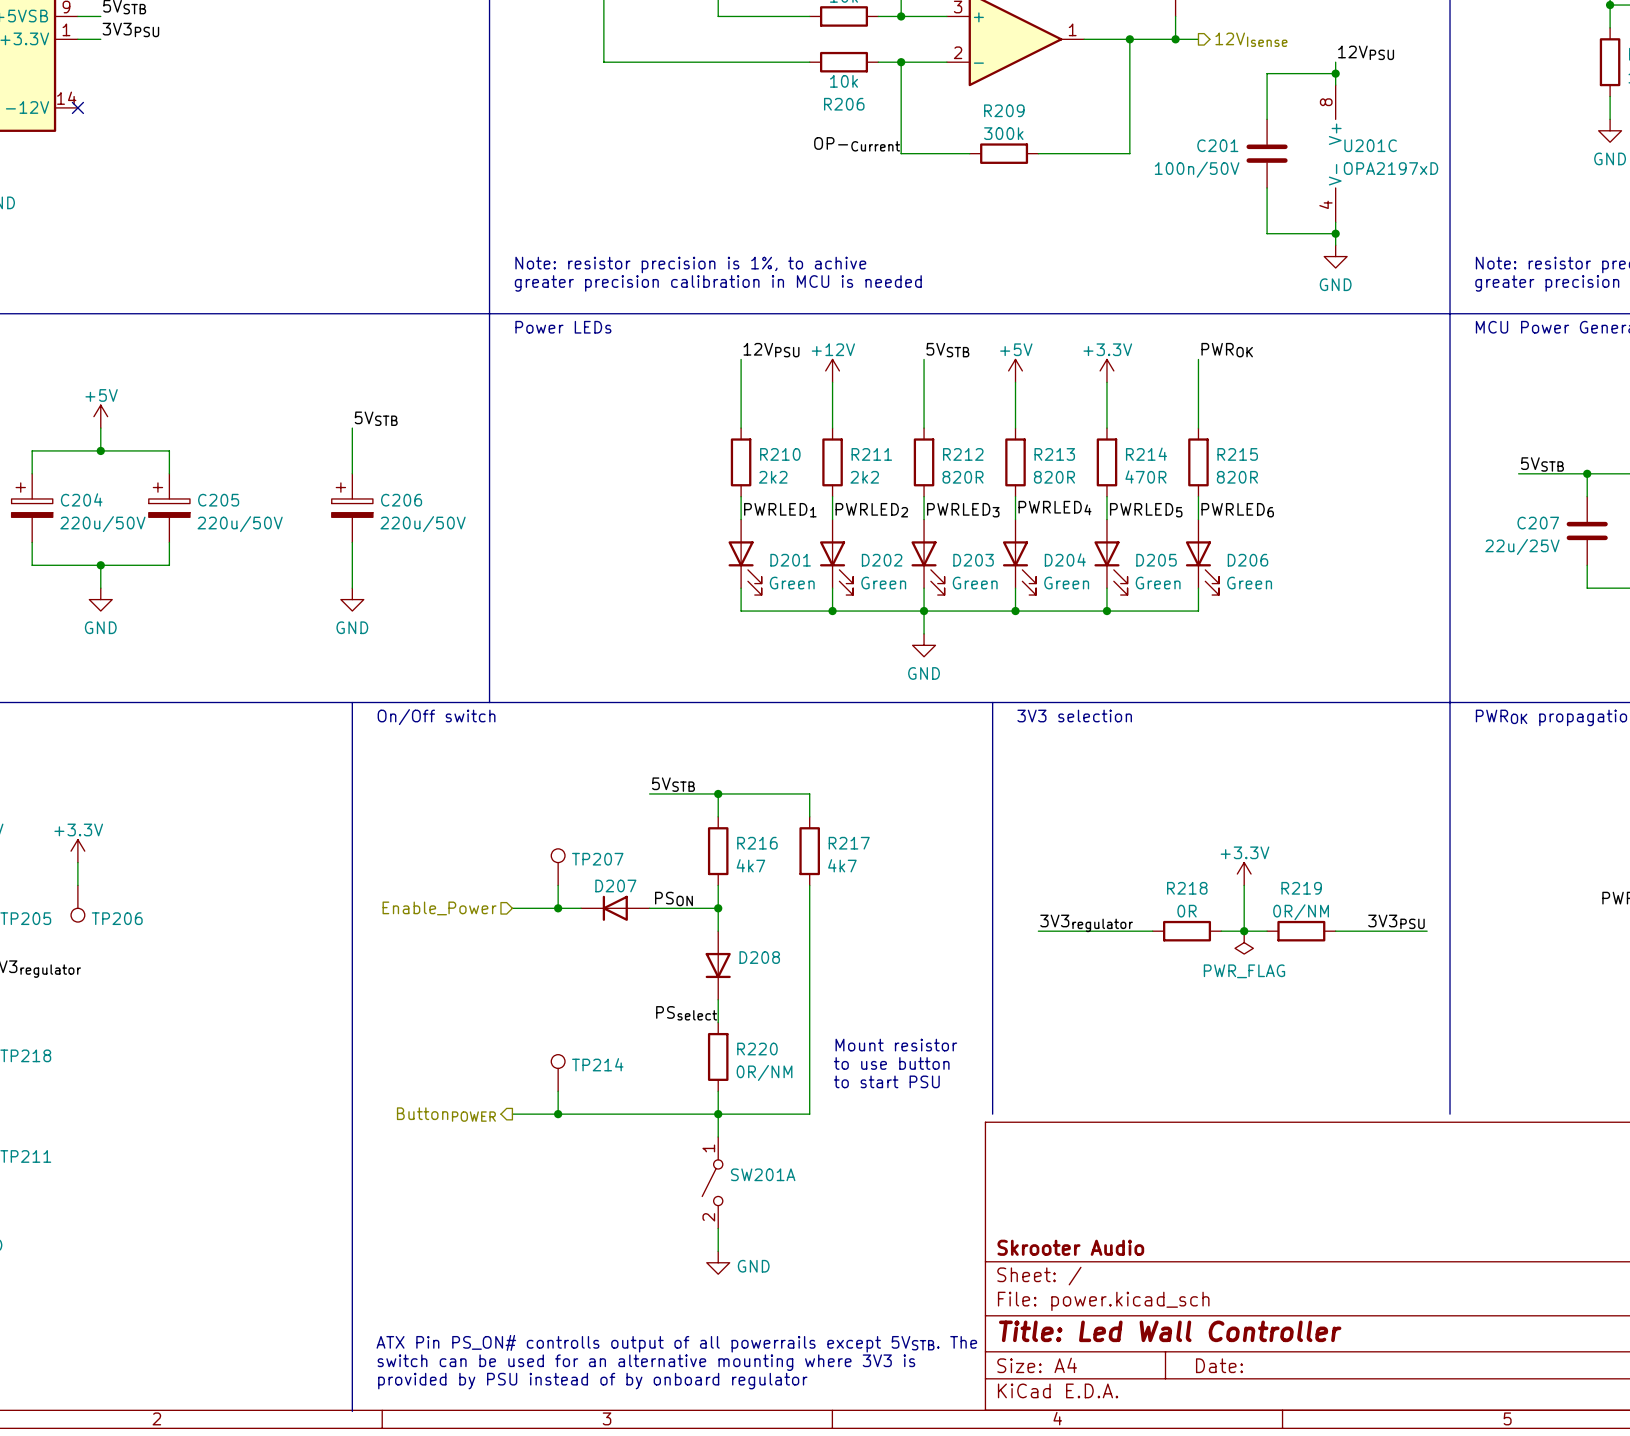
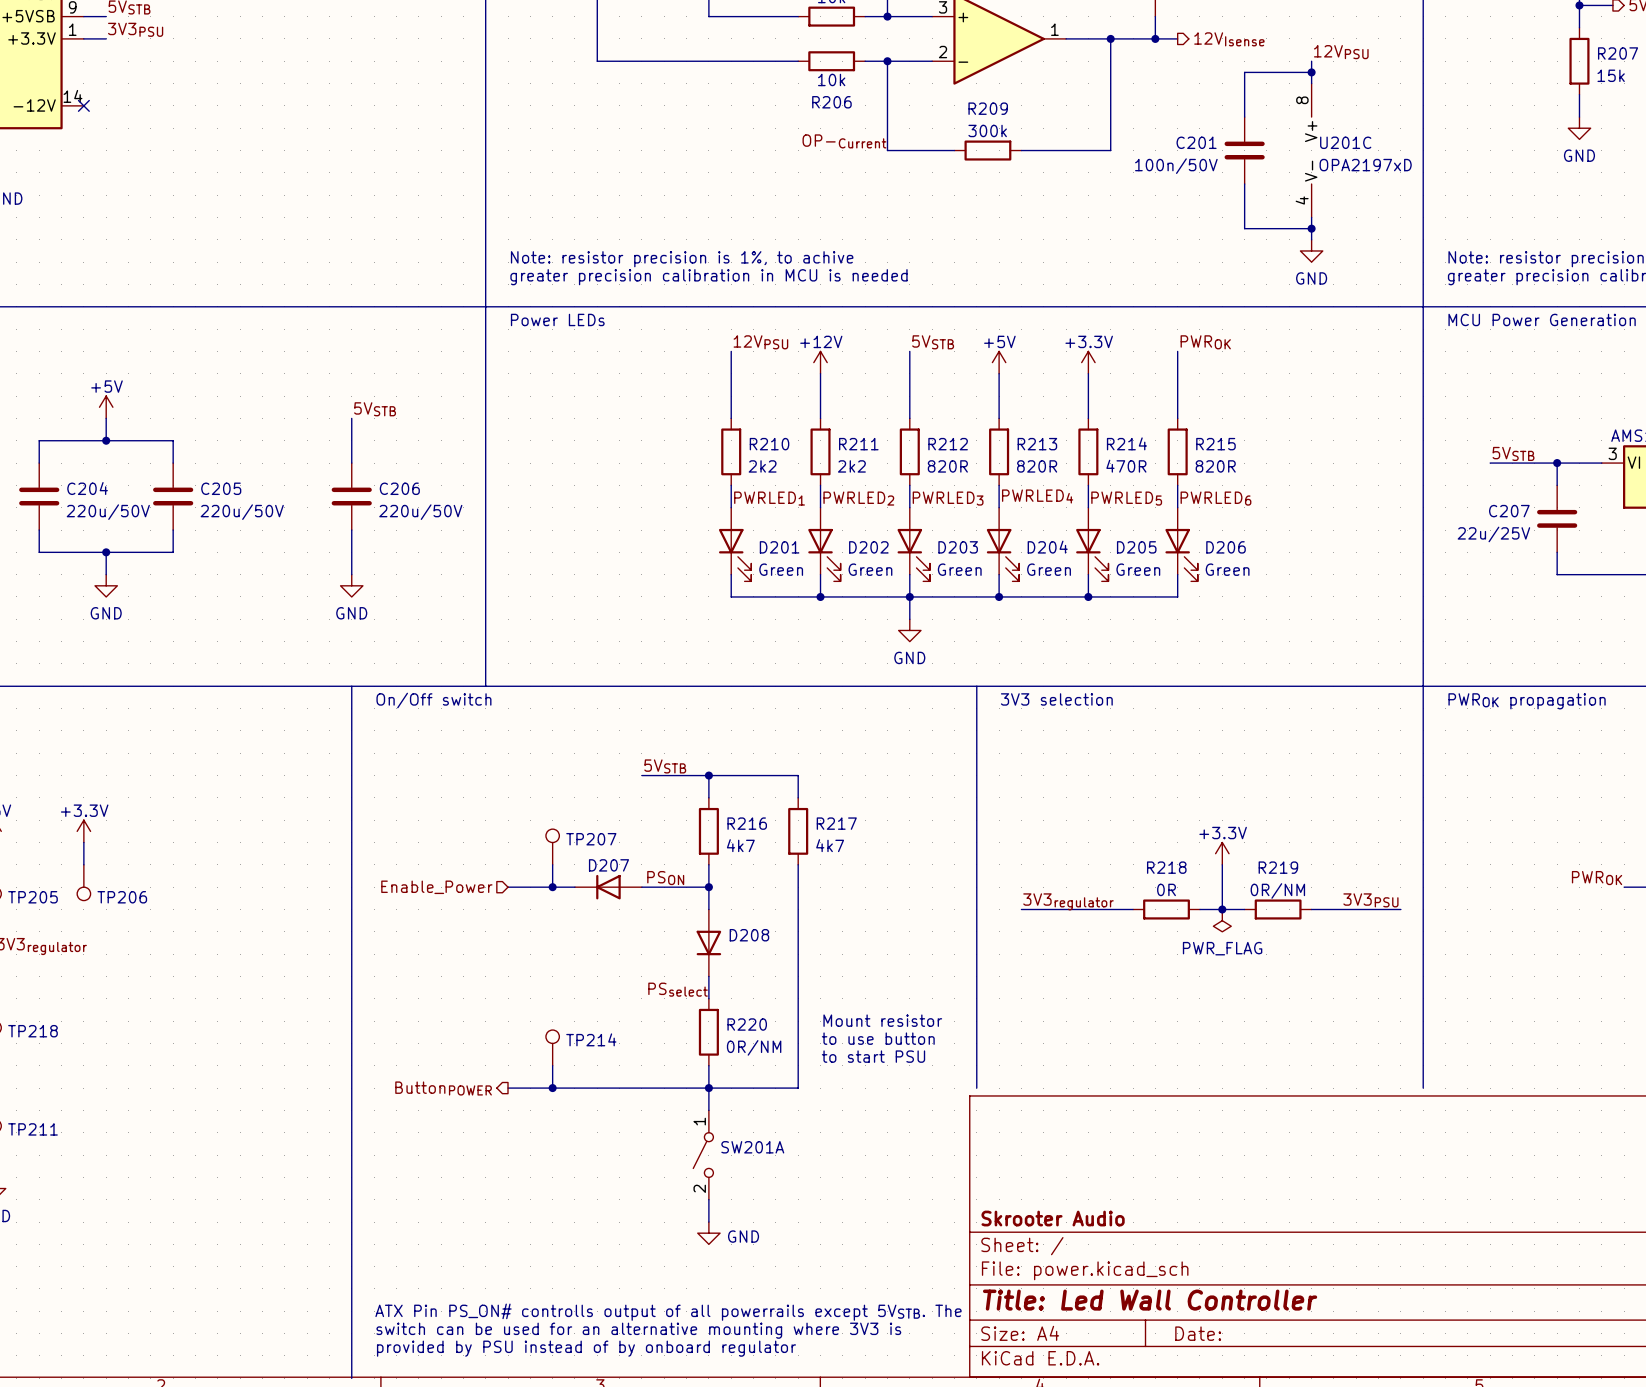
C204 symbol: [11, 473, 53, 543] -> [19, 463, 60, 531]
C205 symbol: [148, 473, 190, 543] -> [153, 463, 194, 531]
C206 symbol: [331, 473, 373, 543] -> [331, 463, 372, 531]

